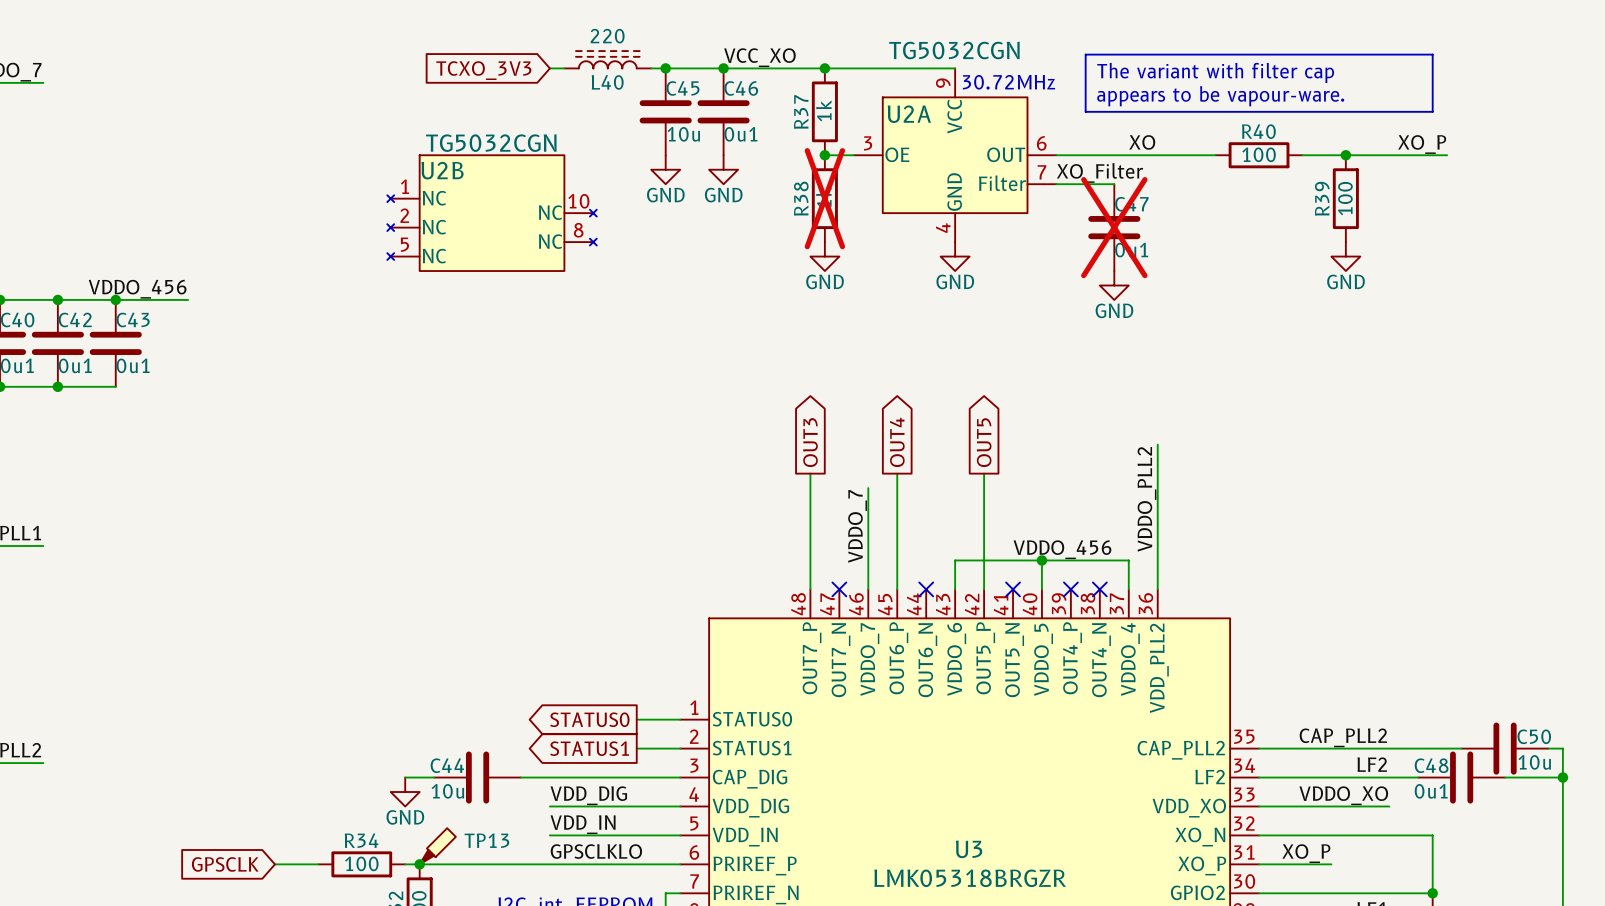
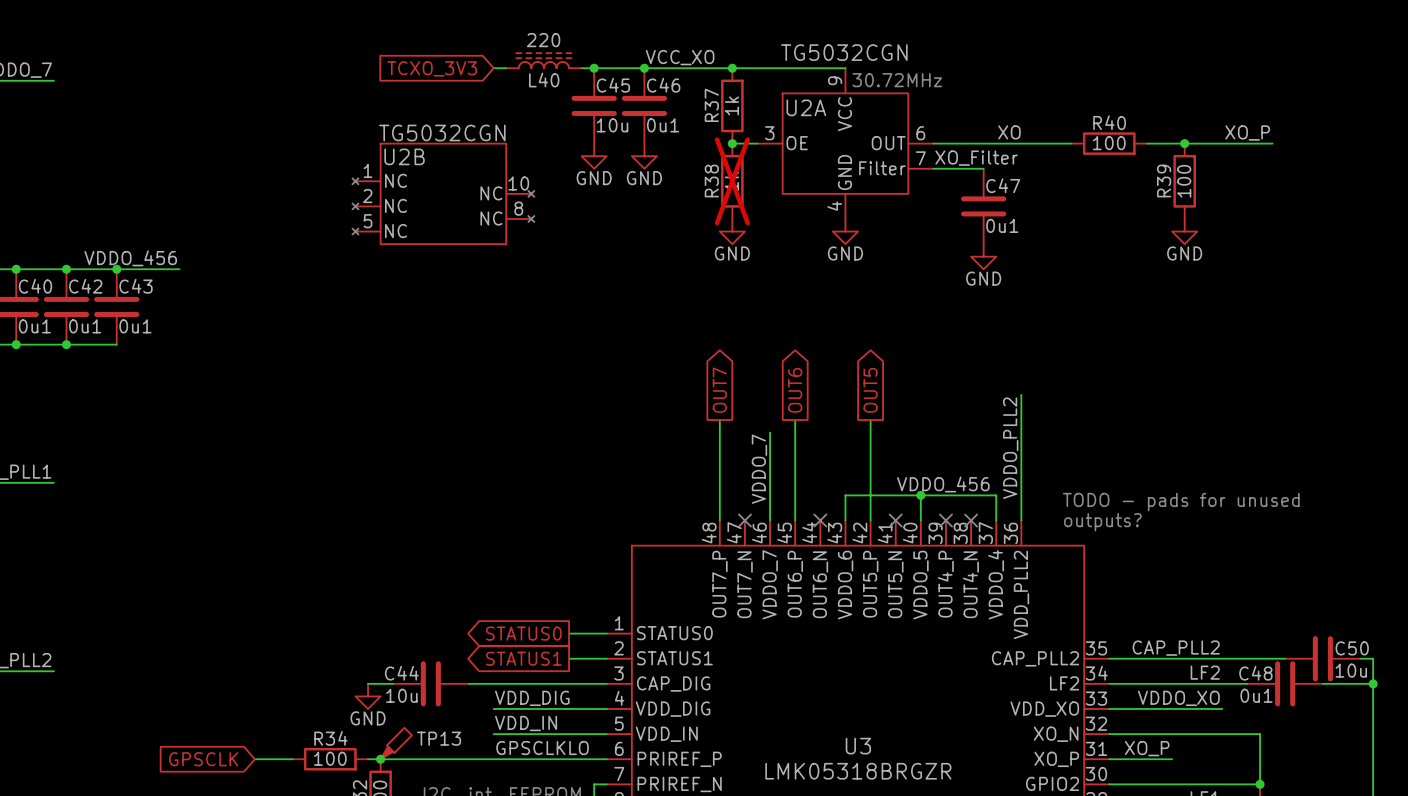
line: (1085, 54) (1432, 54) (1432, 111) (1085, 111) (1085, 54) -> none
text: The variant with filter cap (1215, 72) -> none
text: appears to be vapour-ware. (1220, 96) -> none
C47 do-not-place cross: (1114, 227) -> none
global label: OUT3 (810, 442) -> OUT7 (719, 390)
global label: OUT4 (897, 442) -> OUT6 (795, 390)
text: none -> TODO - pads for unused (1181, 502)
text: none -> outputs? (1102, 522)

